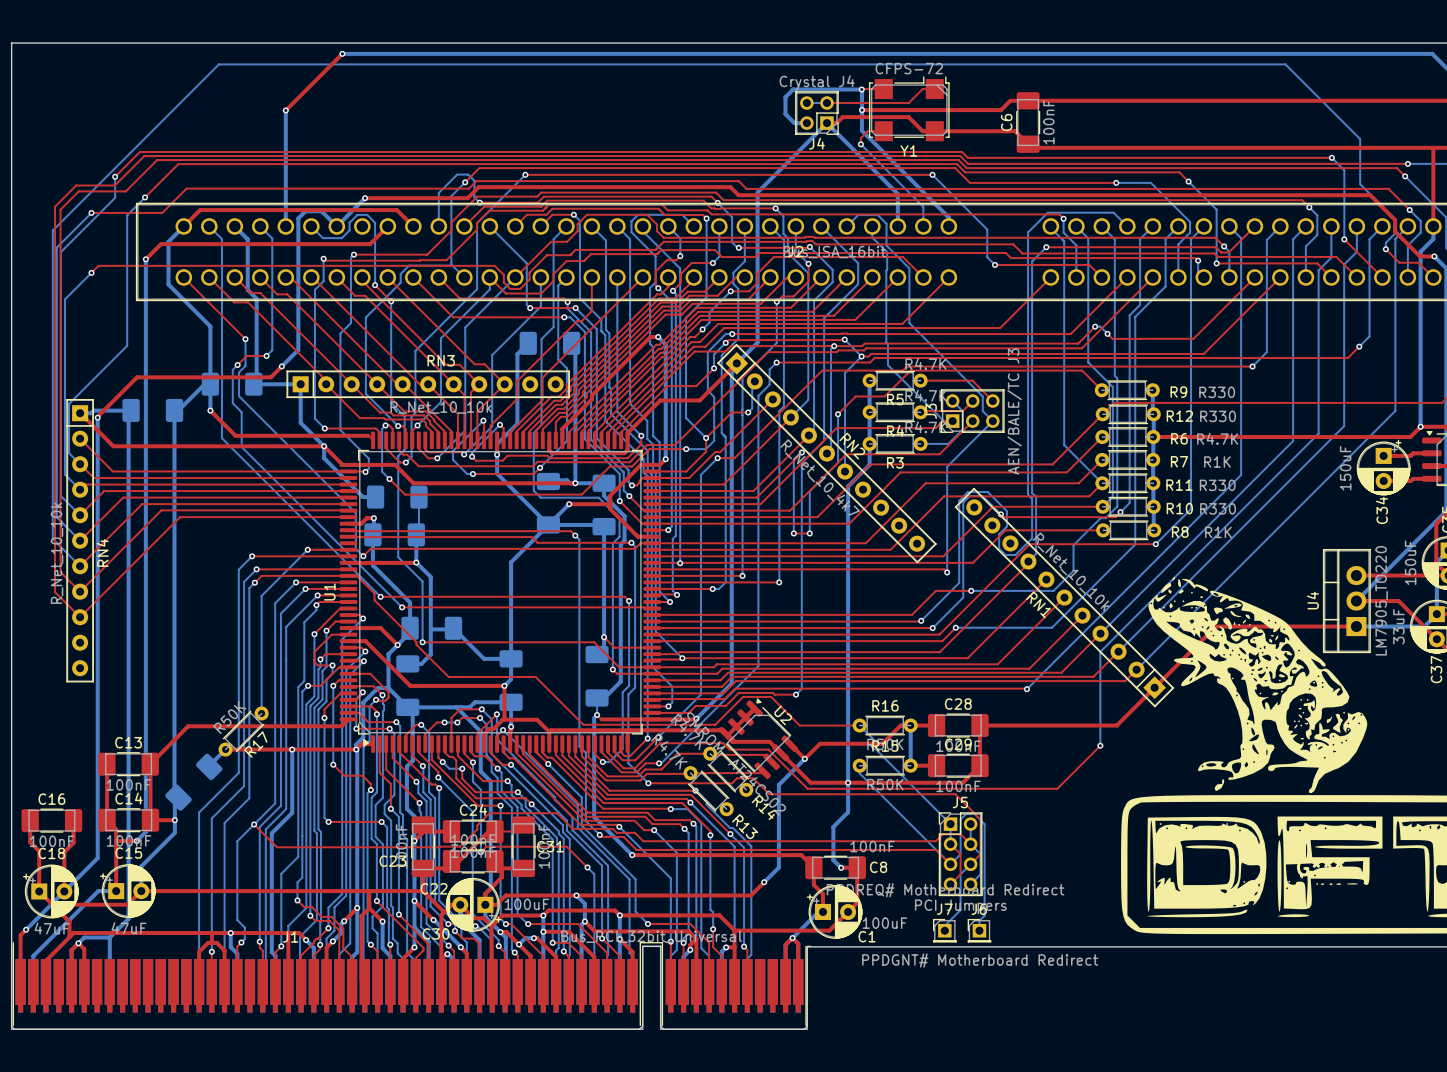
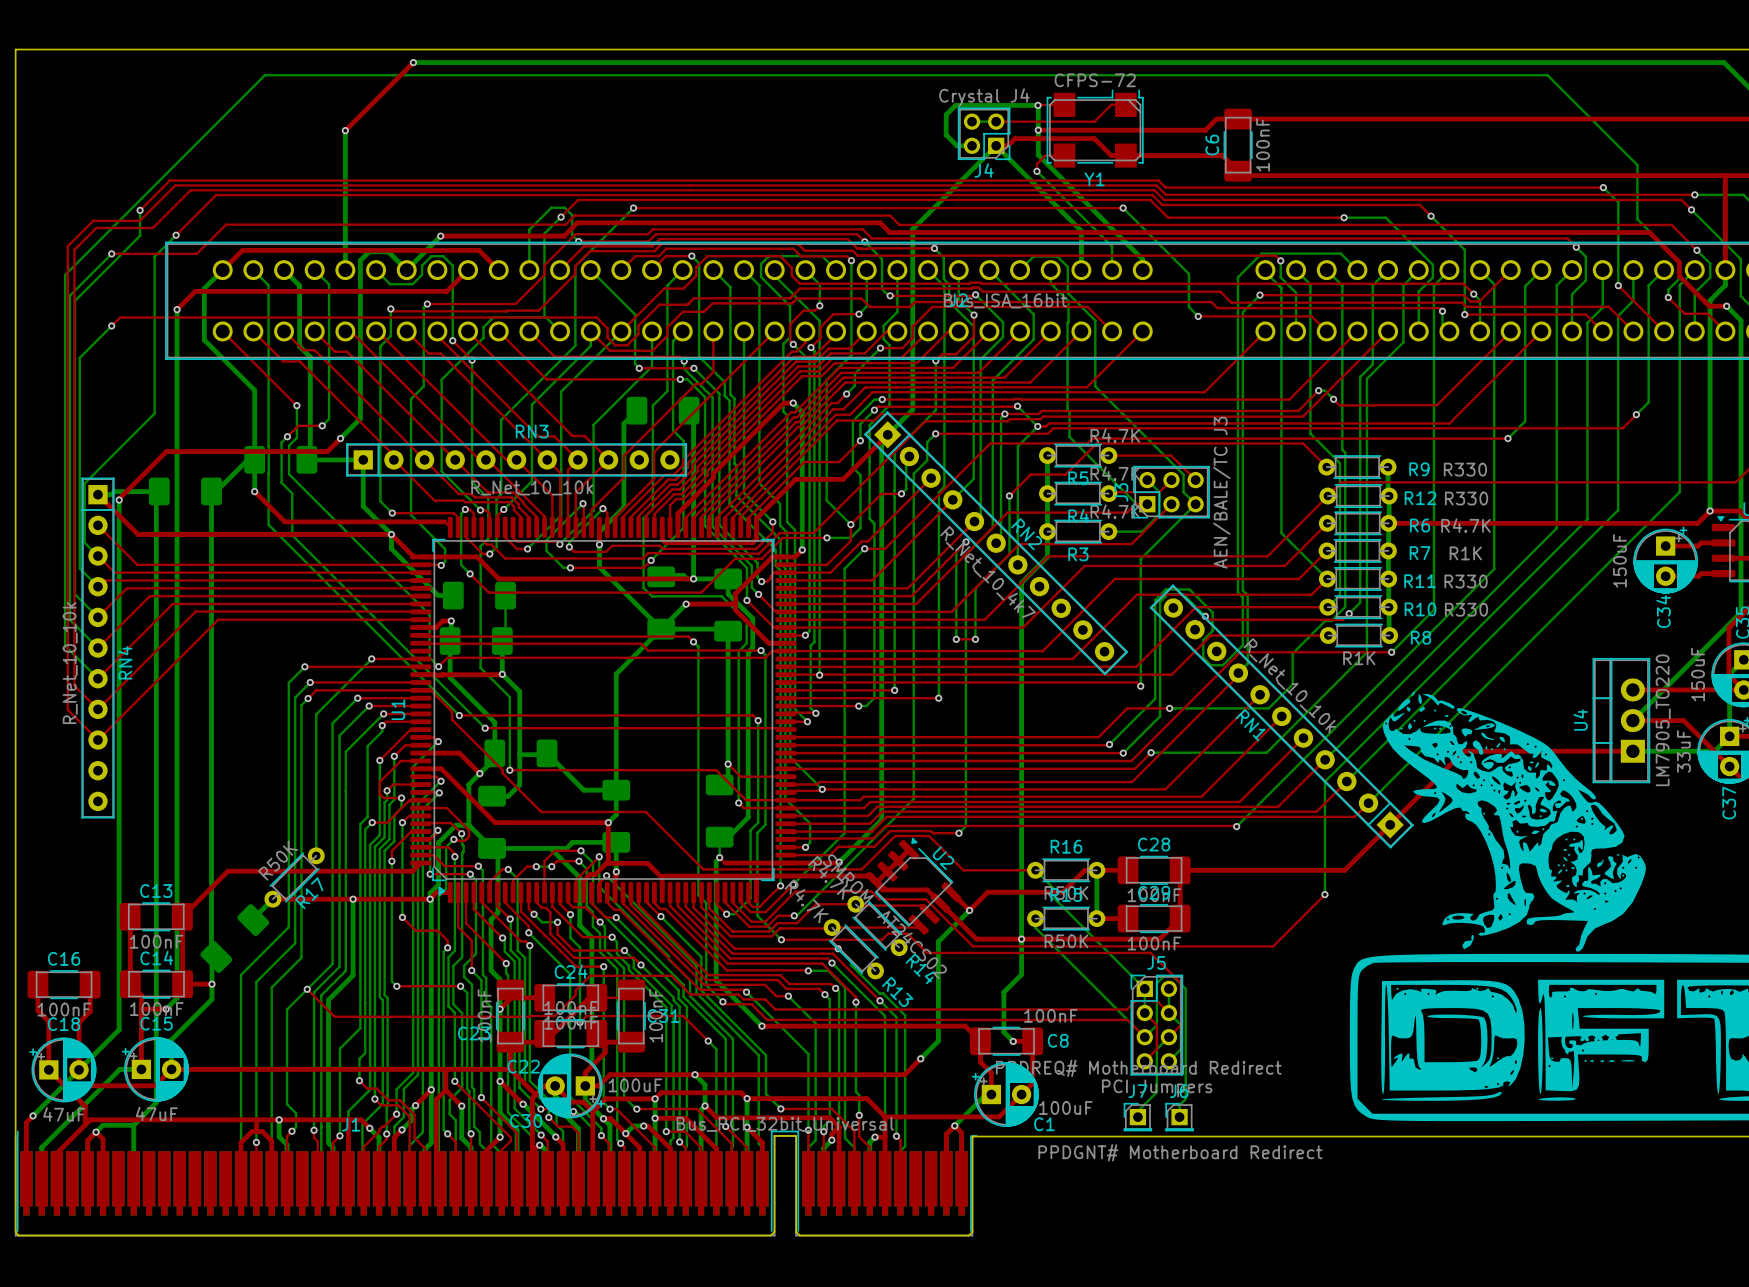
R8 value position: R1K (1218, 532) -> R1K (1359, 658)

